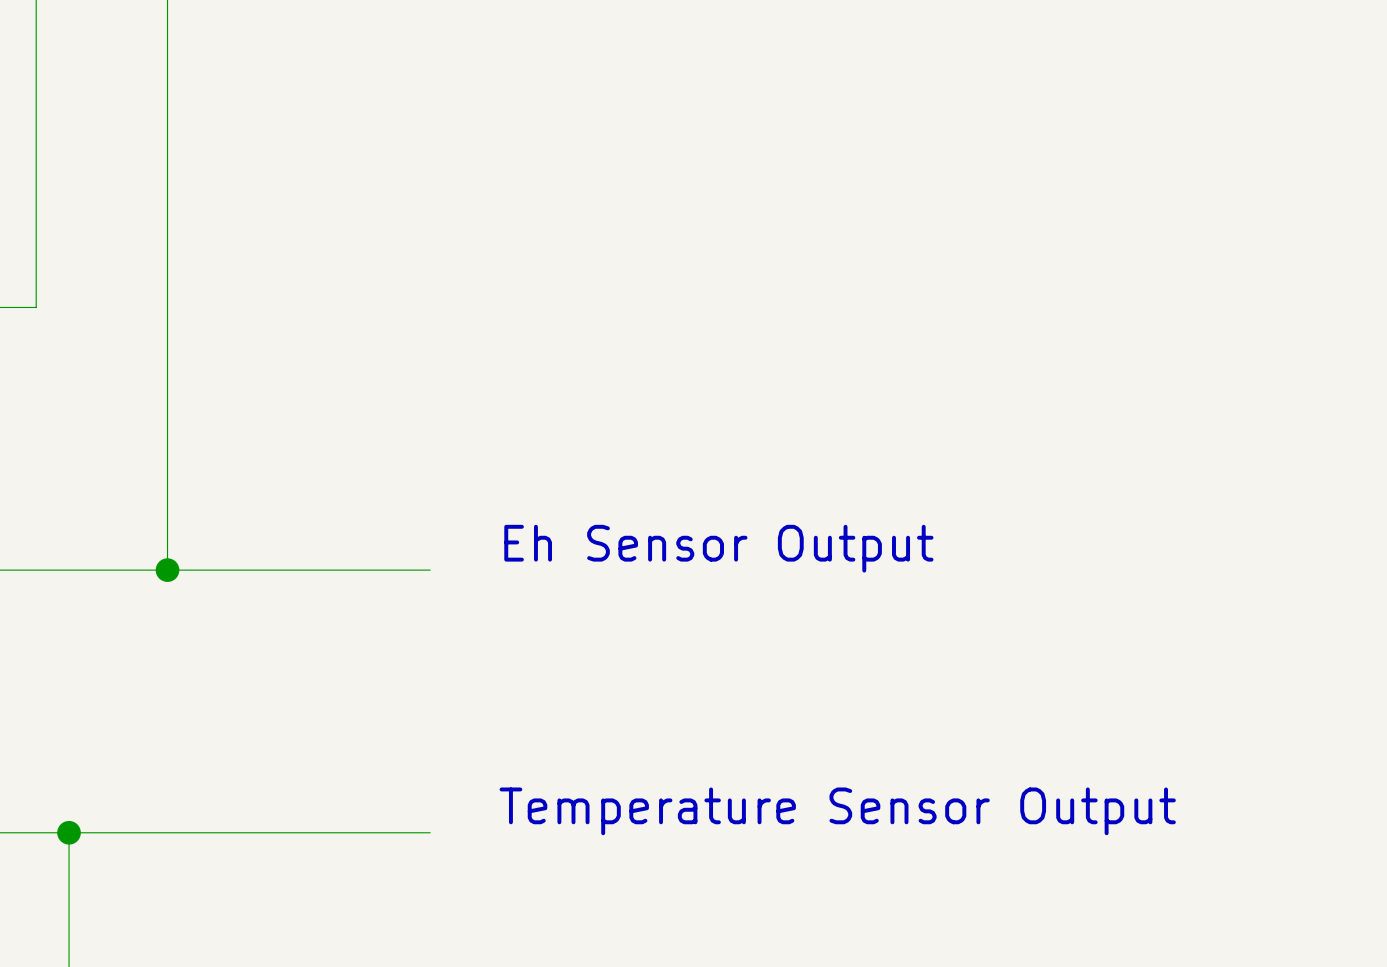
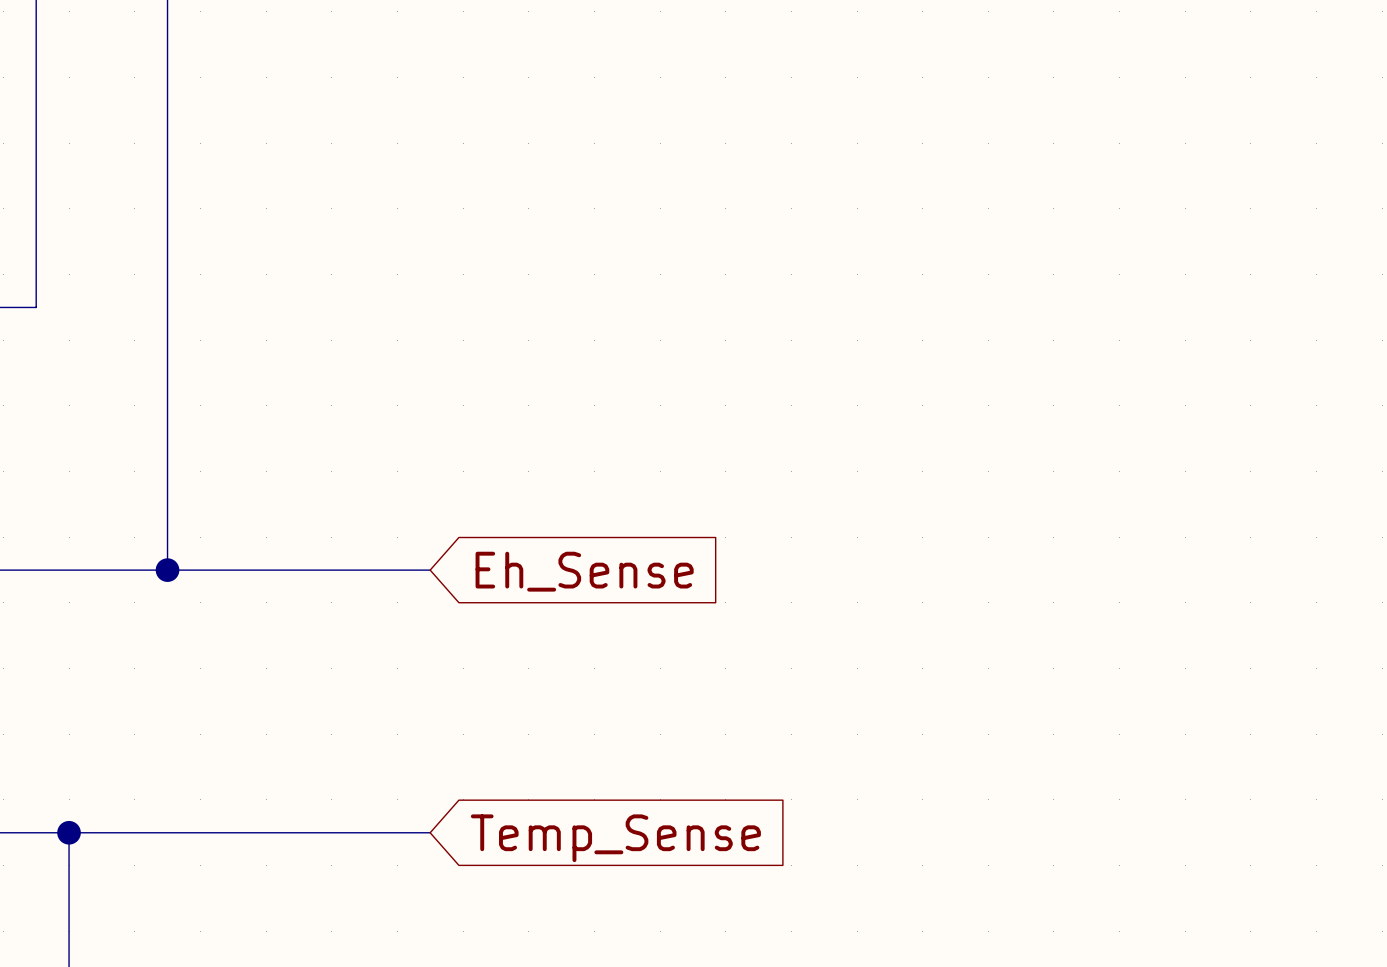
text: Eh Sensor Output (718, 548) -> none
global label: none -> Eh_Sense (584, 571)
text: Temperature Sensor Output (837, 811) -> none
global label: none -> Temp_Sense (615, 838)

